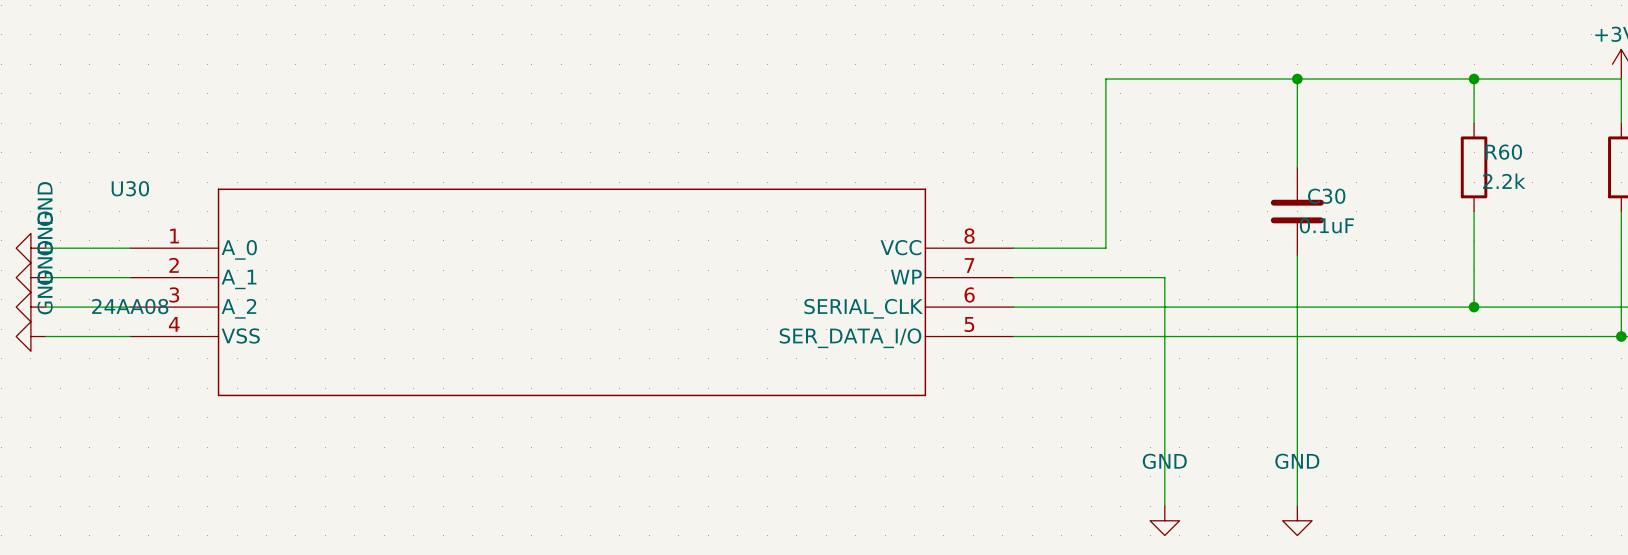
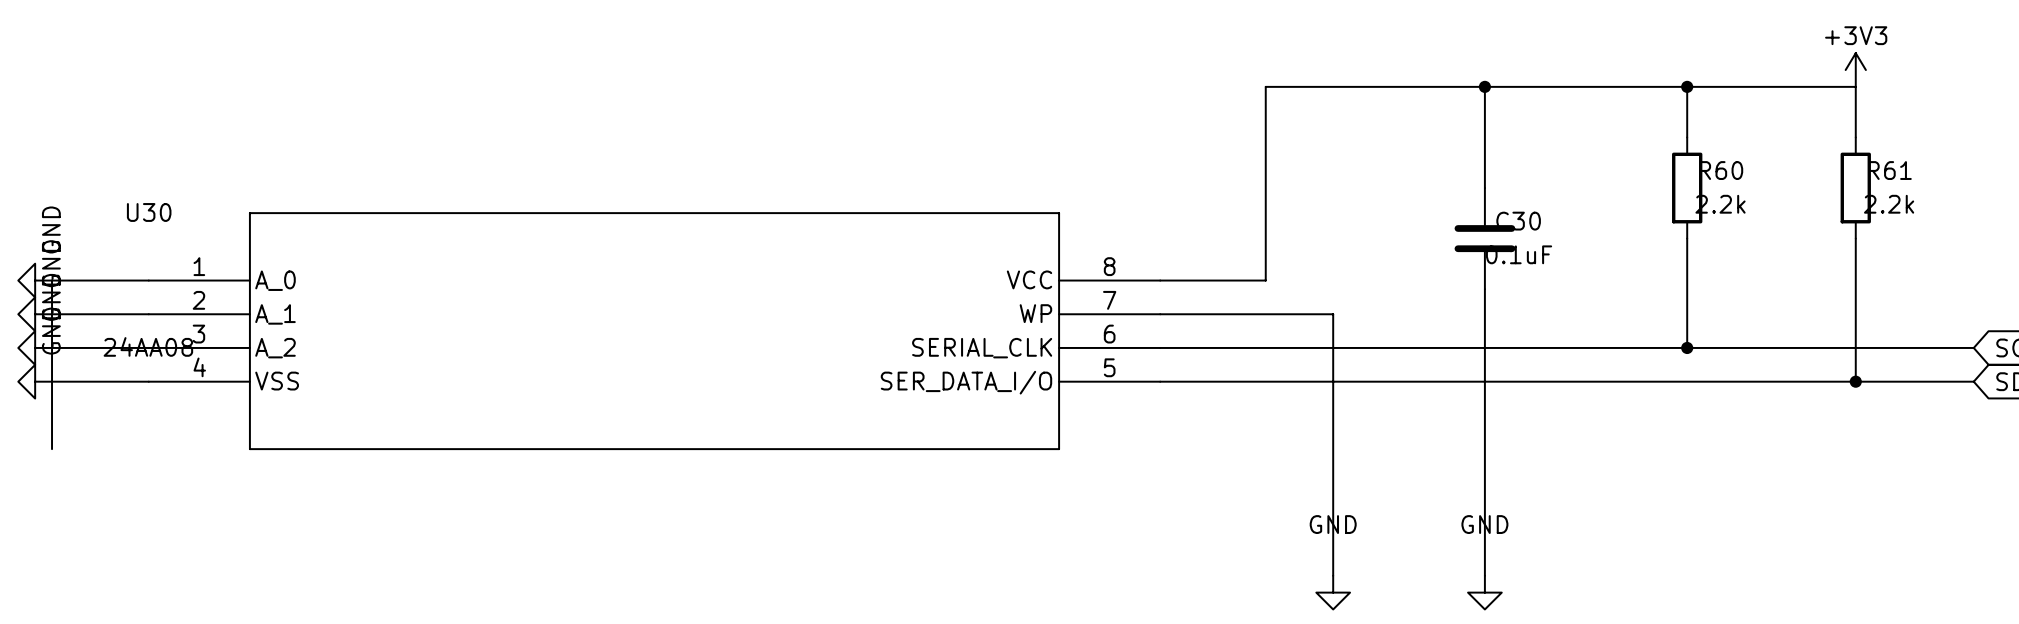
wire: none -> (52, 280) (52, 449)

